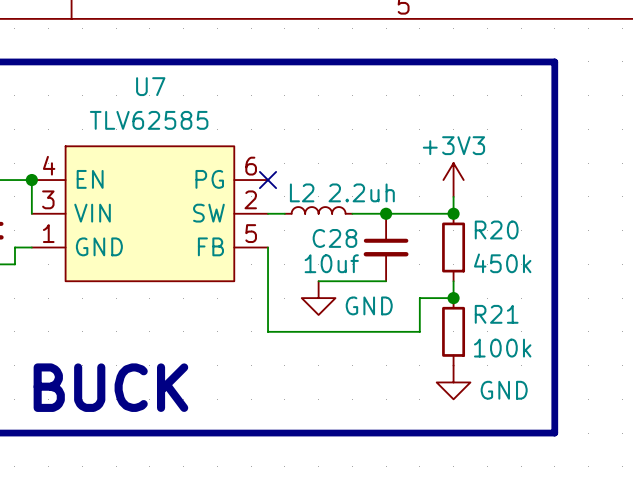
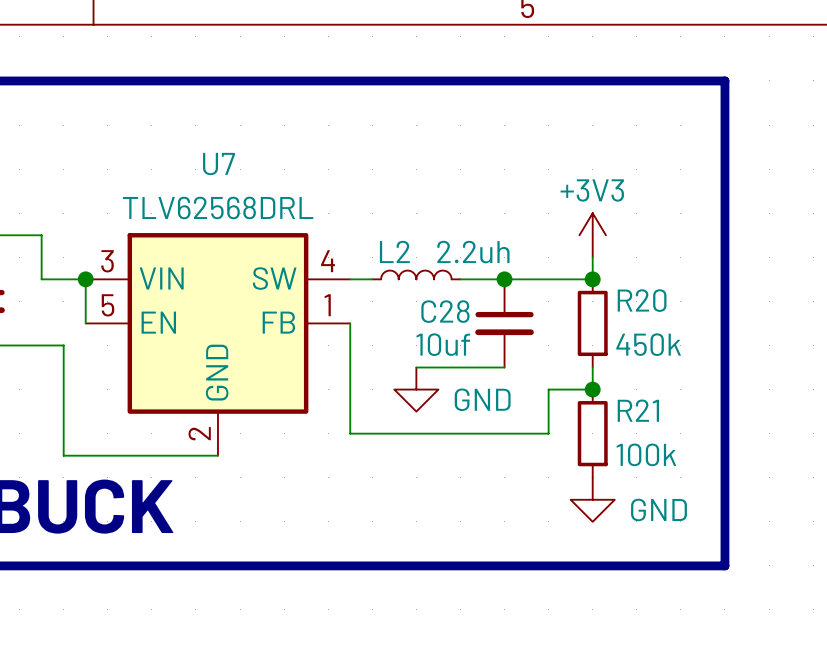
U7 value: TLV62585 (149, 120) -> TLV62568DRL (218, 207)
U7 symbol: [31, 146, 269, 282] -> [85, 233, 351, 456]
junction position: (31, 180) -> (85, 279)
no-connect mark: (268, 180) -> none
wire: (31, 247) (14, 247) (14, 264) -> (217, 455) (63, 455) (63, 345) (19, 345)

